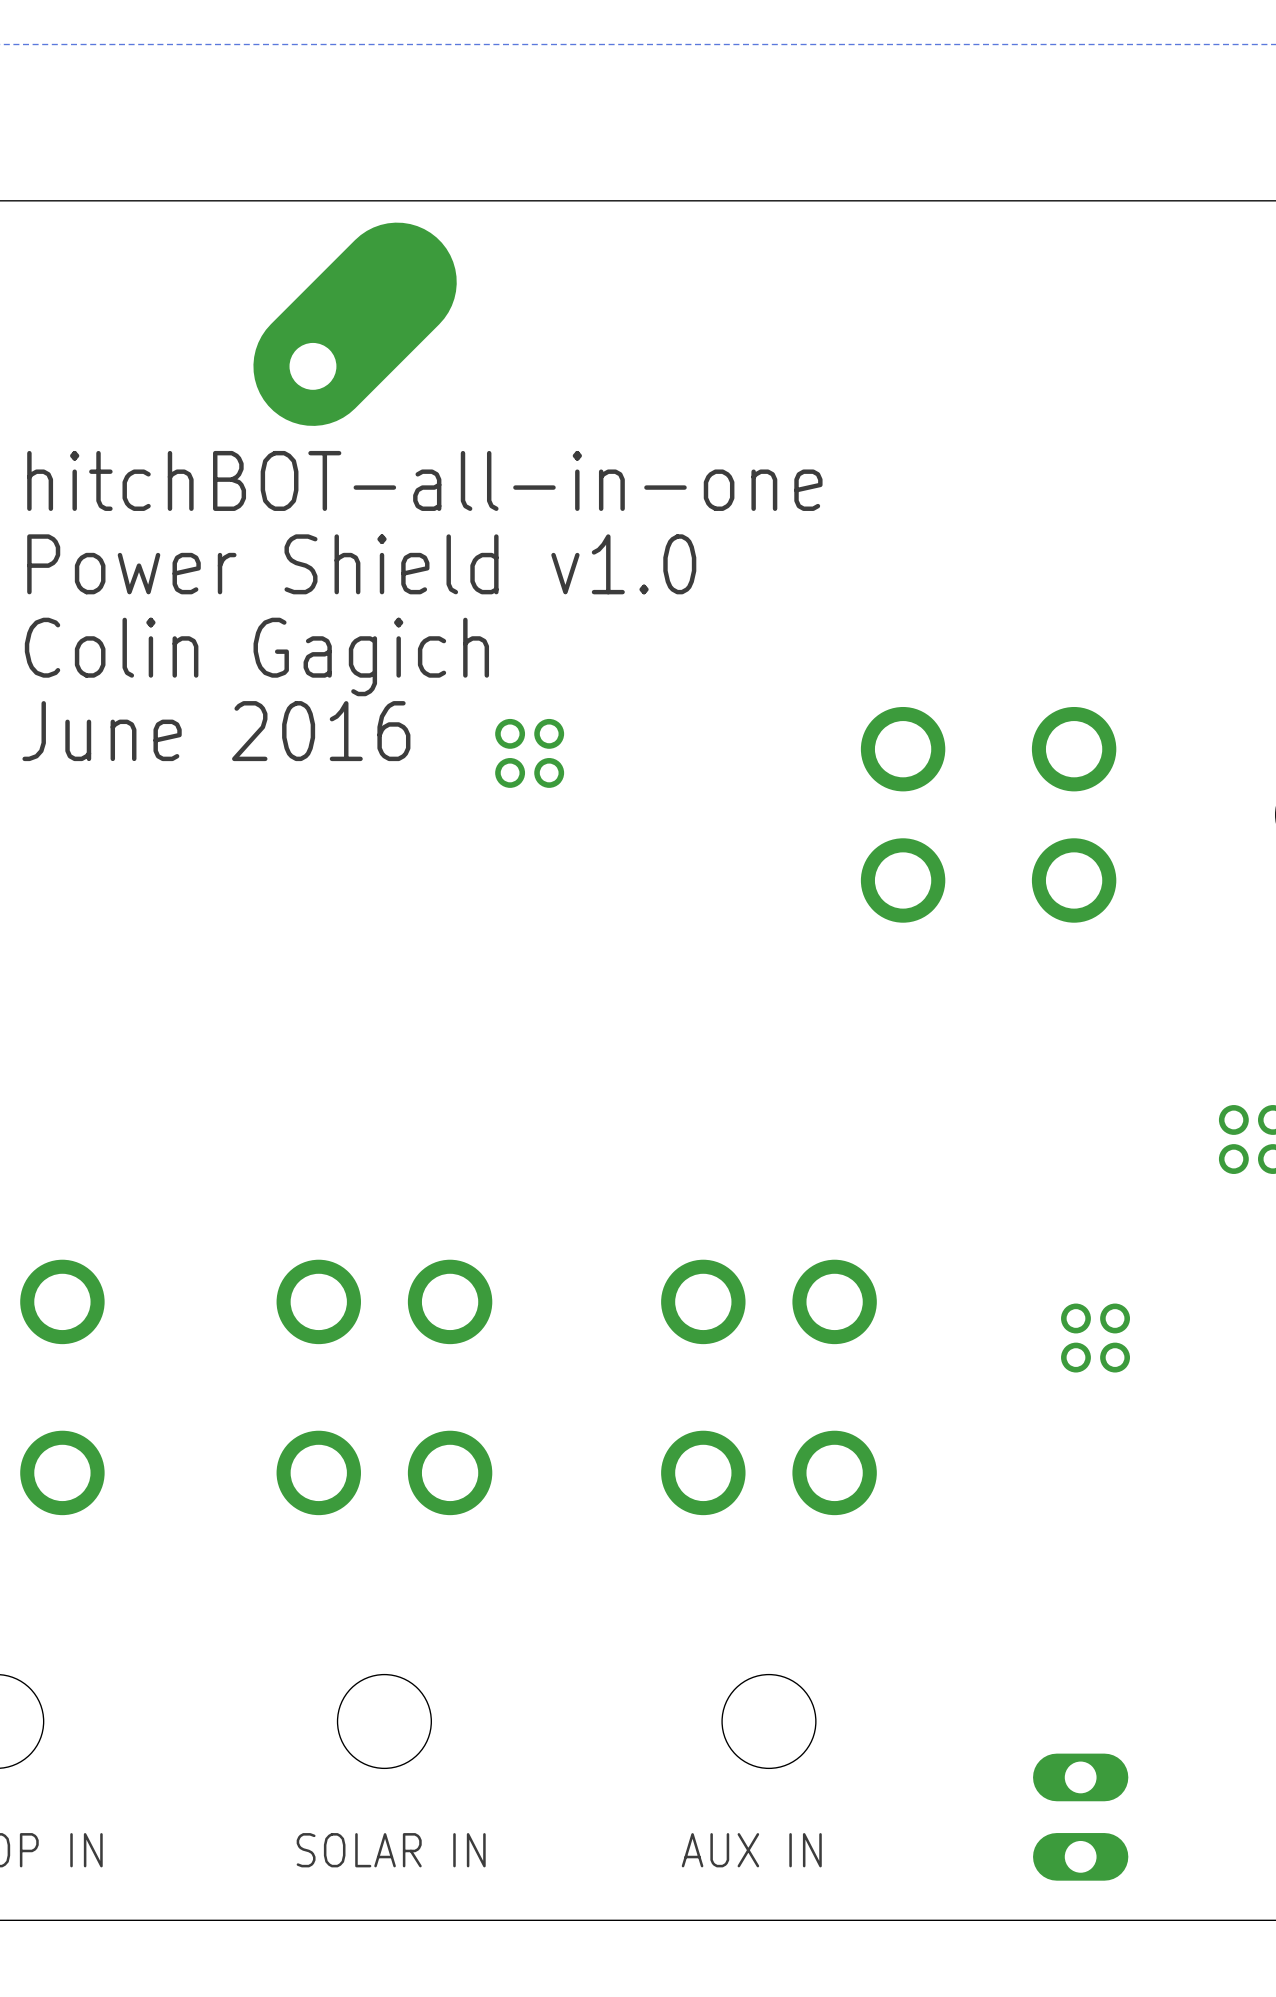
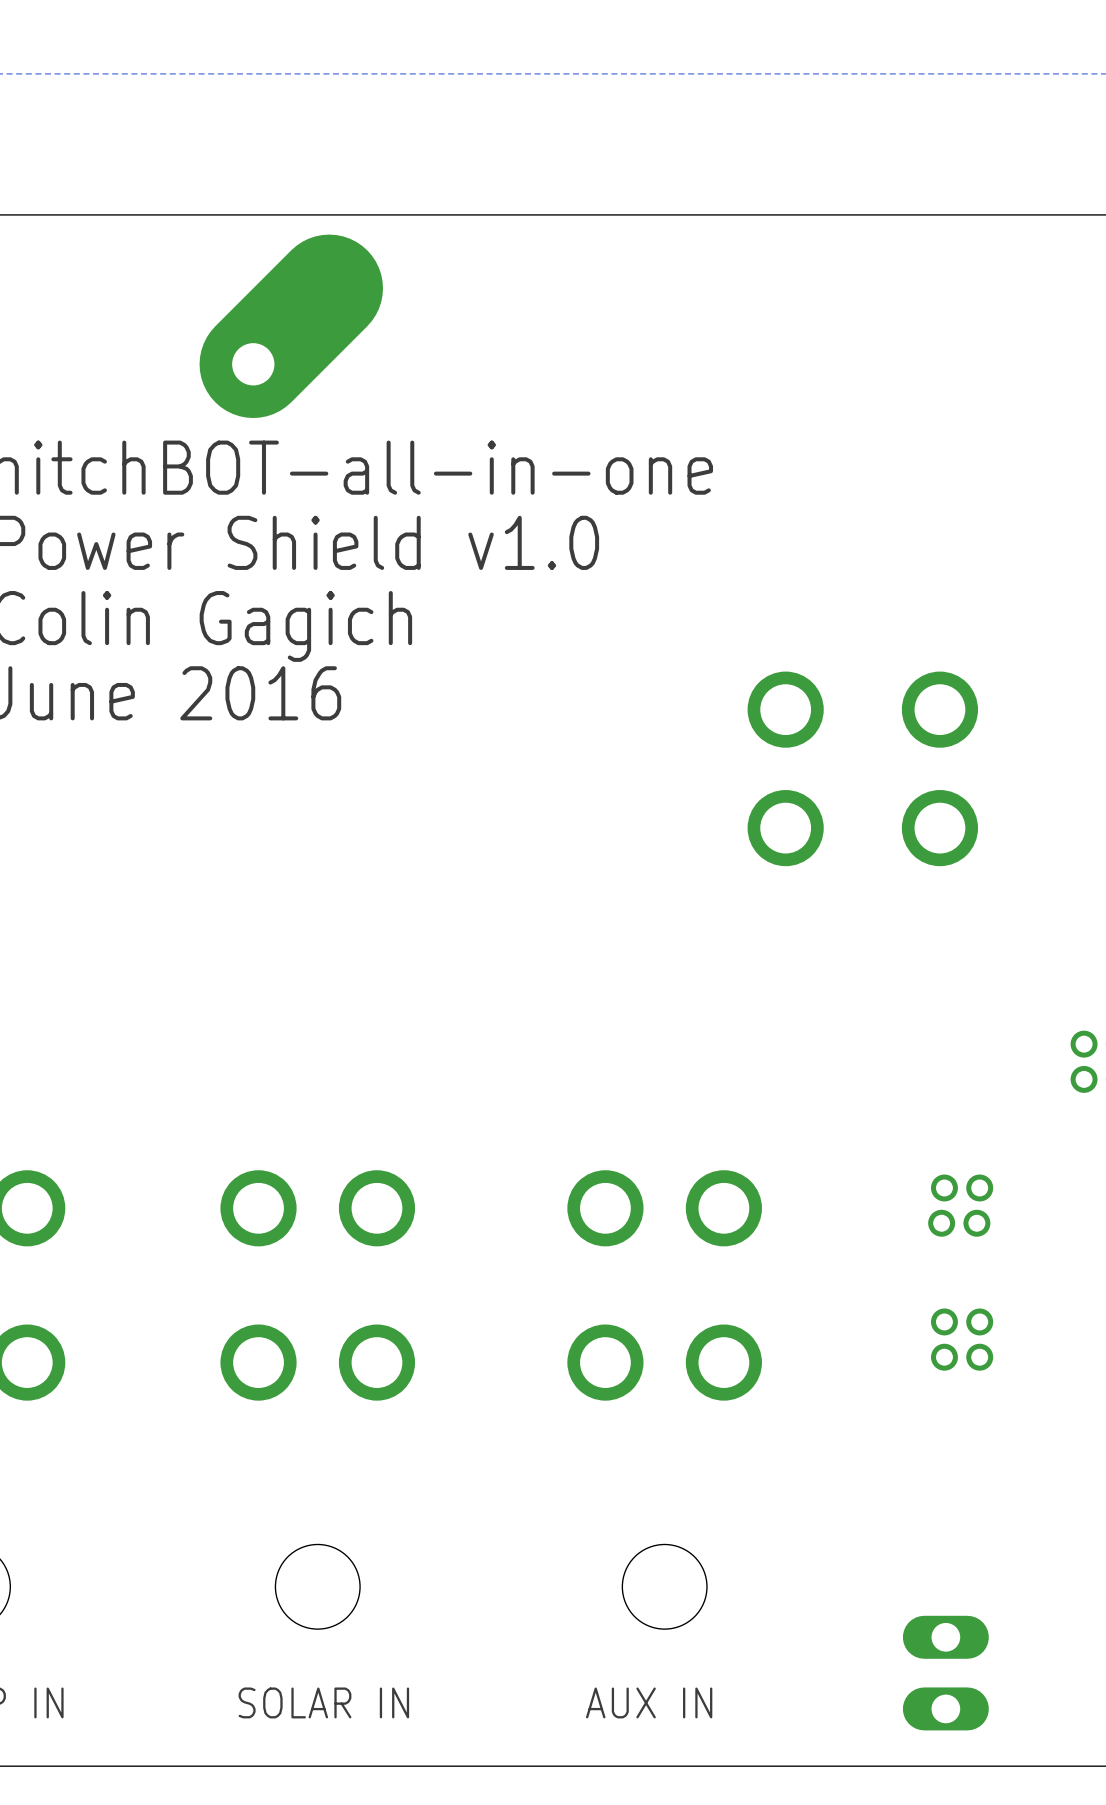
via: (510, 733) -> none
via: (549, 733) -> none
via: (510, 772) -> none
via: (549, 772) -> none
via: none -> (944, 1187)
via: none -> (979, 1187)
via: (1075, 1357) -> none
via: (1115, 1357) -> none
via: none -> (944, 1321)
via: none -> (979, 1321)
via: none -> (944, 1357)
via: none -> (979, 1357)

